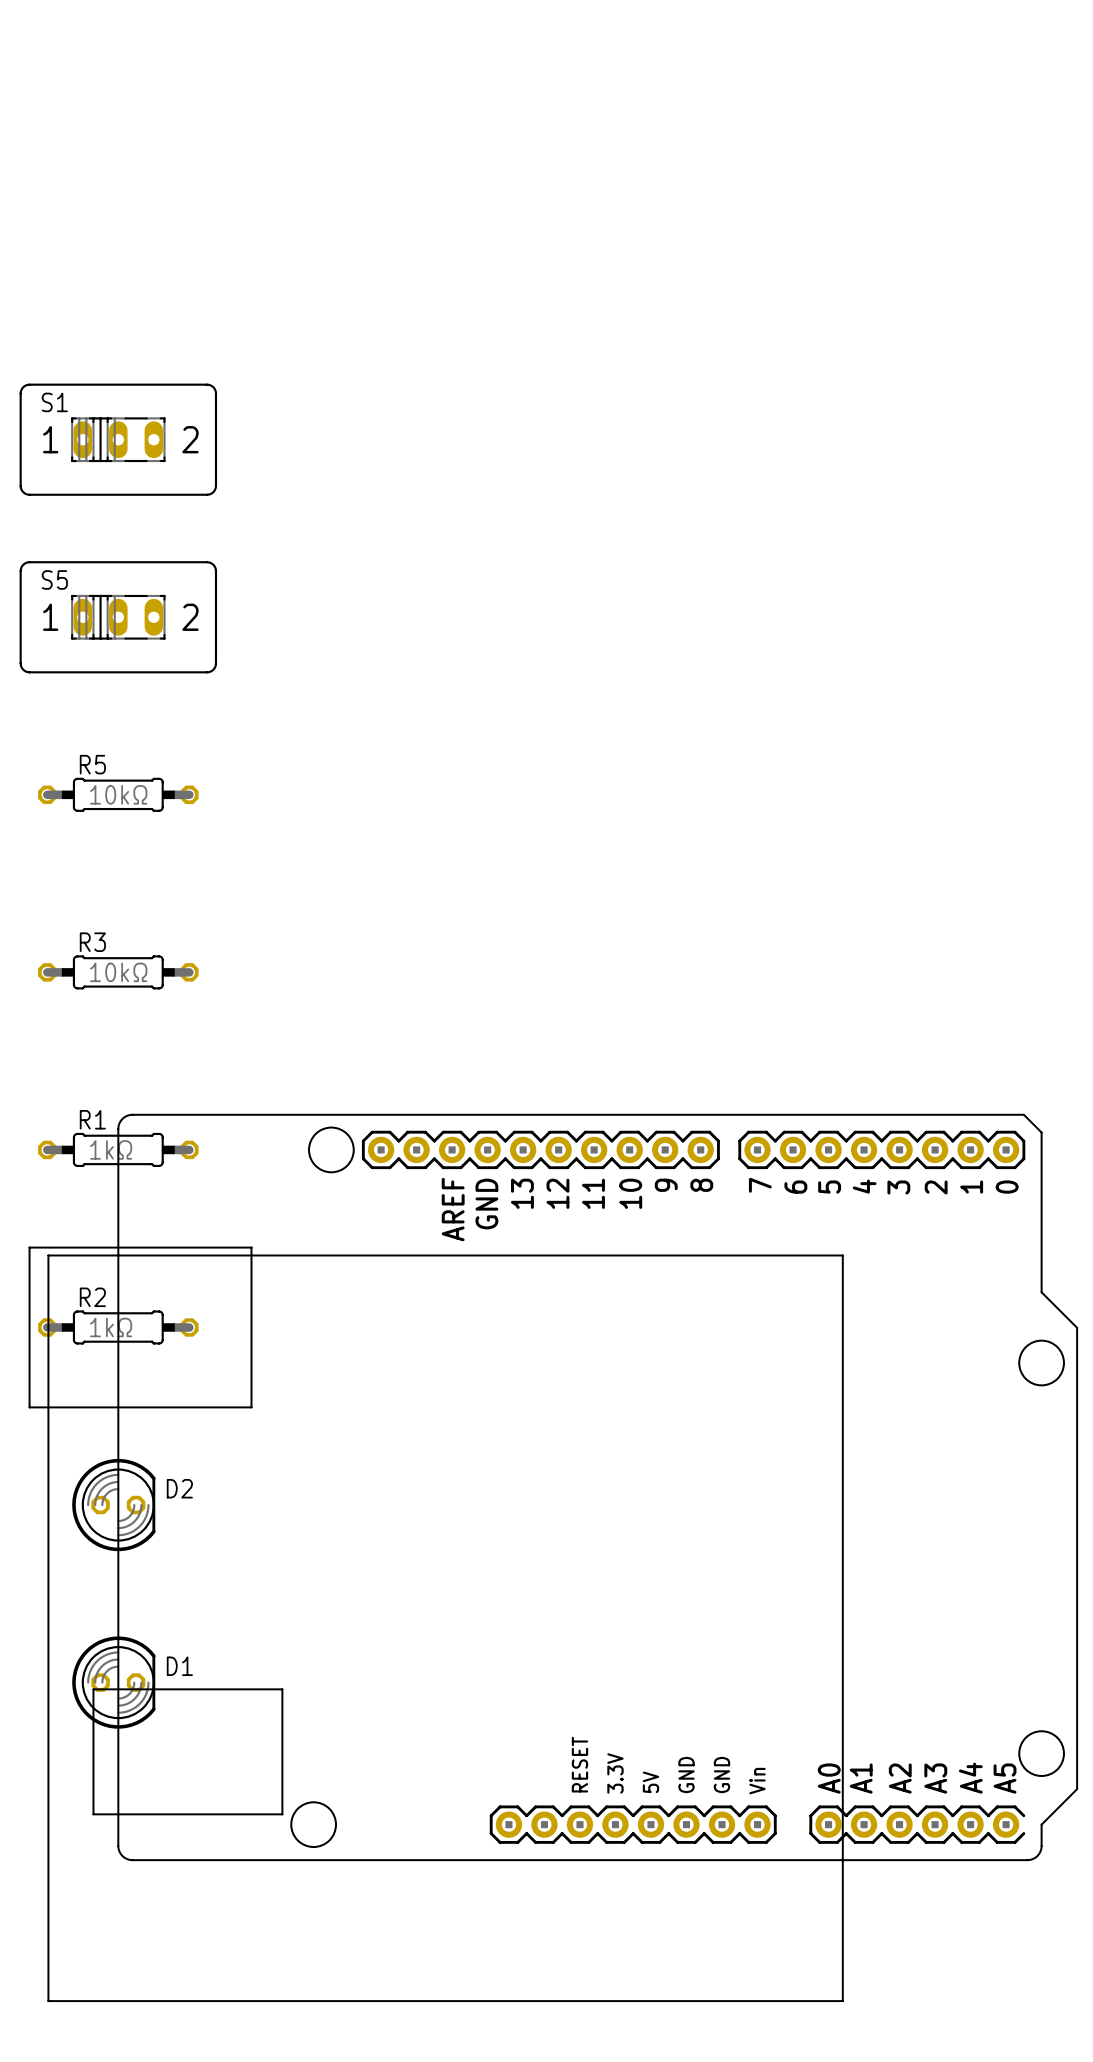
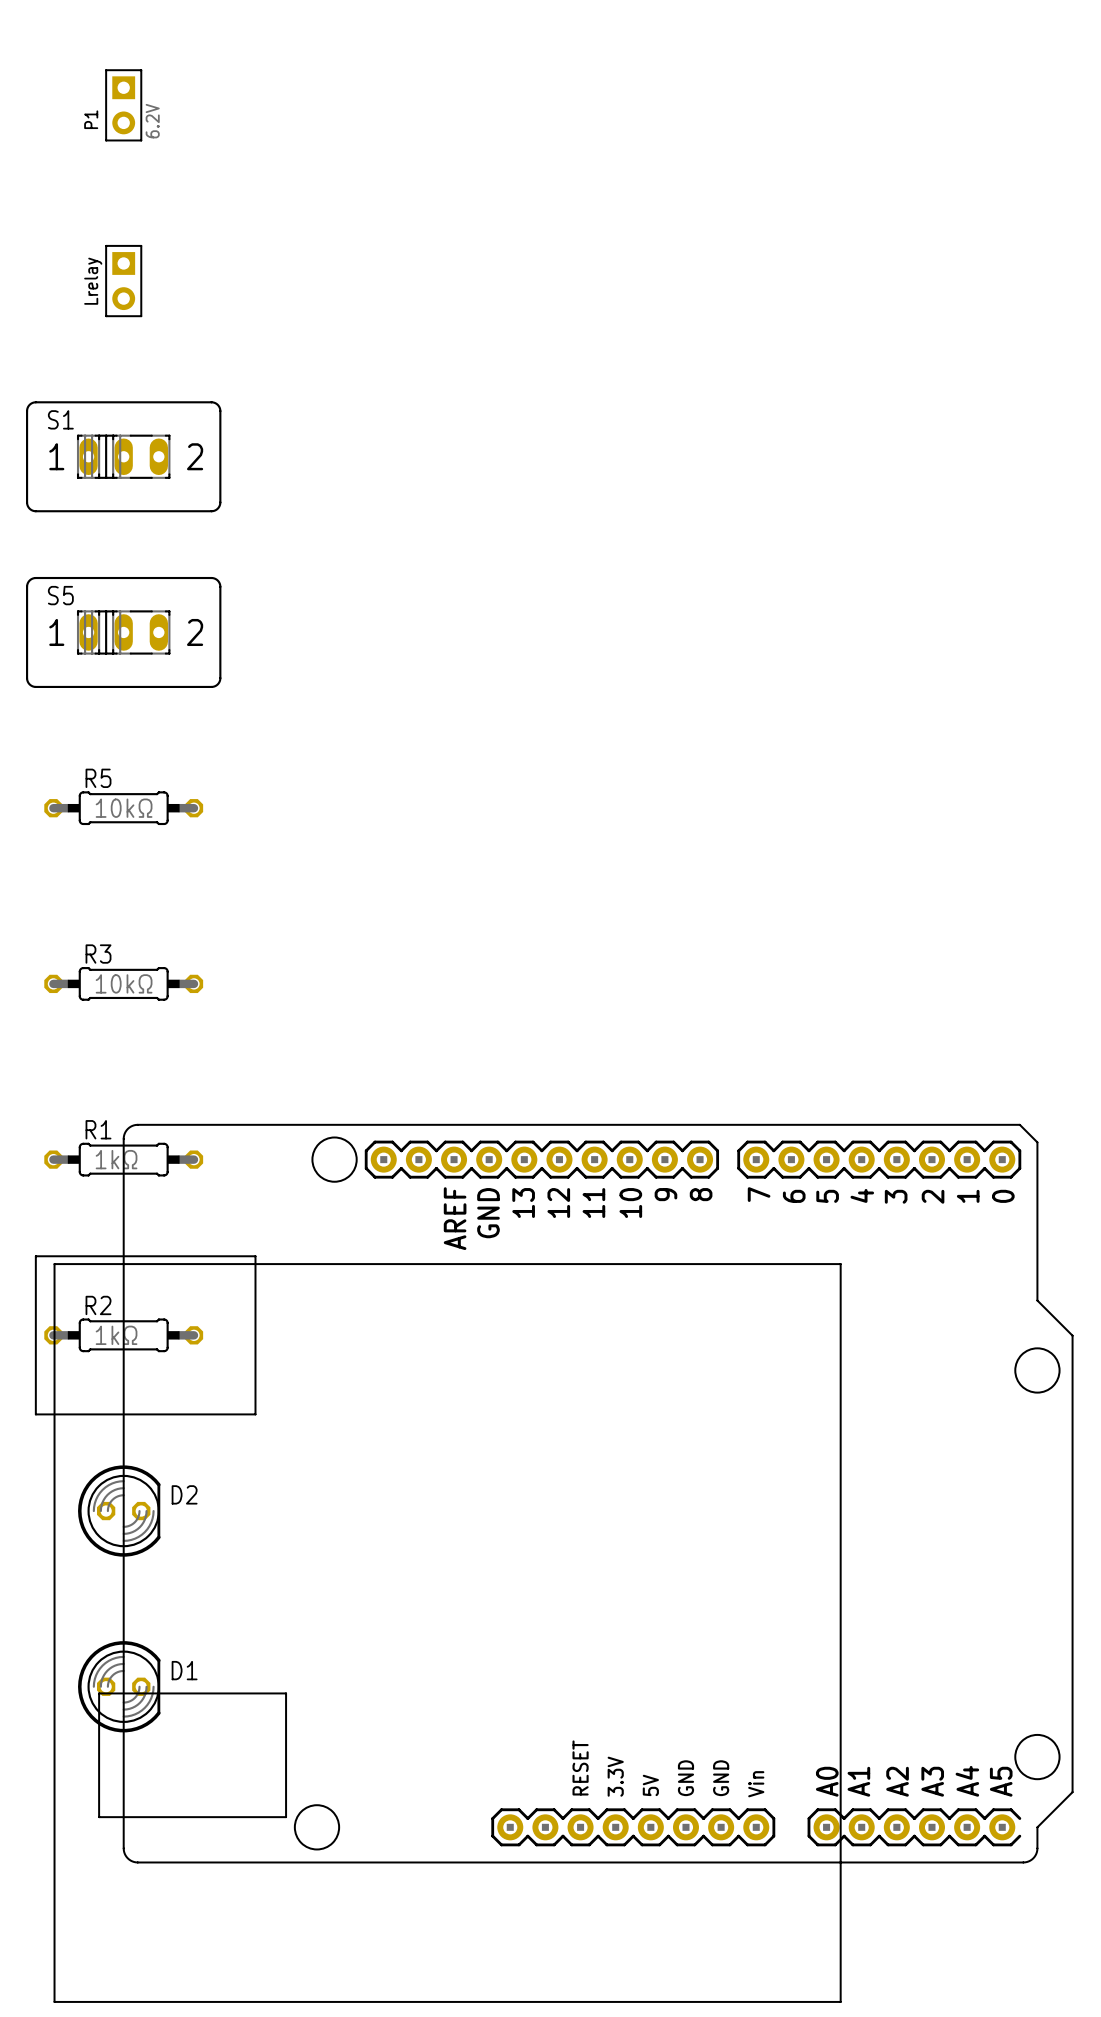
P1: none -> 6.2V (123, 105)
Lrelay: none -> (123, 281)

